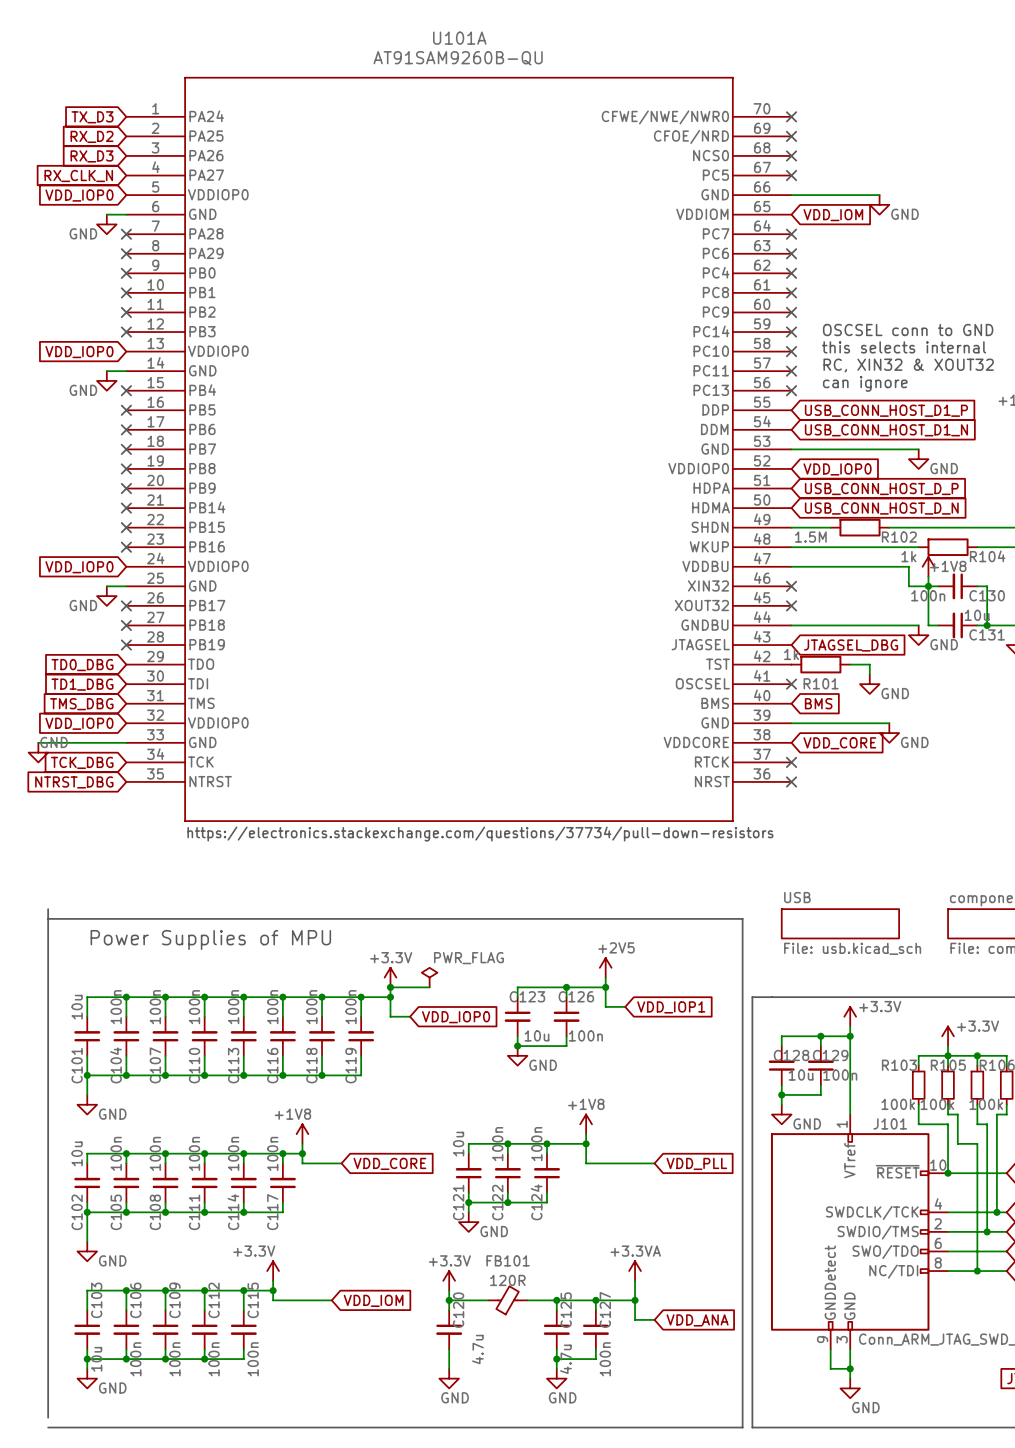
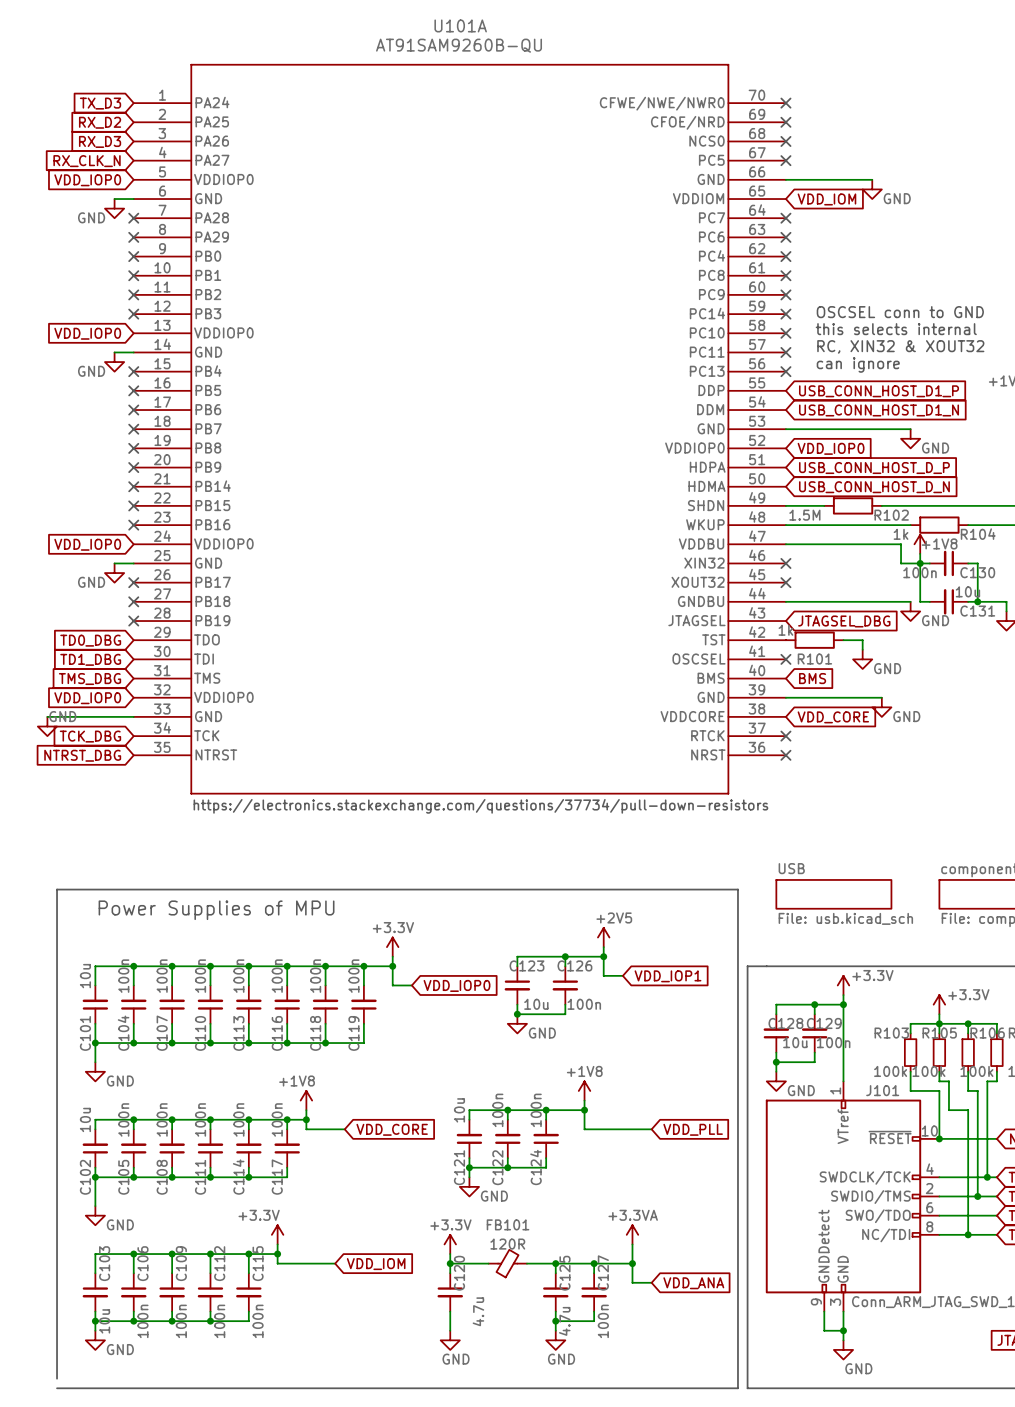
line: (48, 909) (48, 918) -> none
power symbol: PWR_FLAG (429, 977) -> none
wire: (390, 987) (429, 987) -> none
junction: (390, 987) -> none

